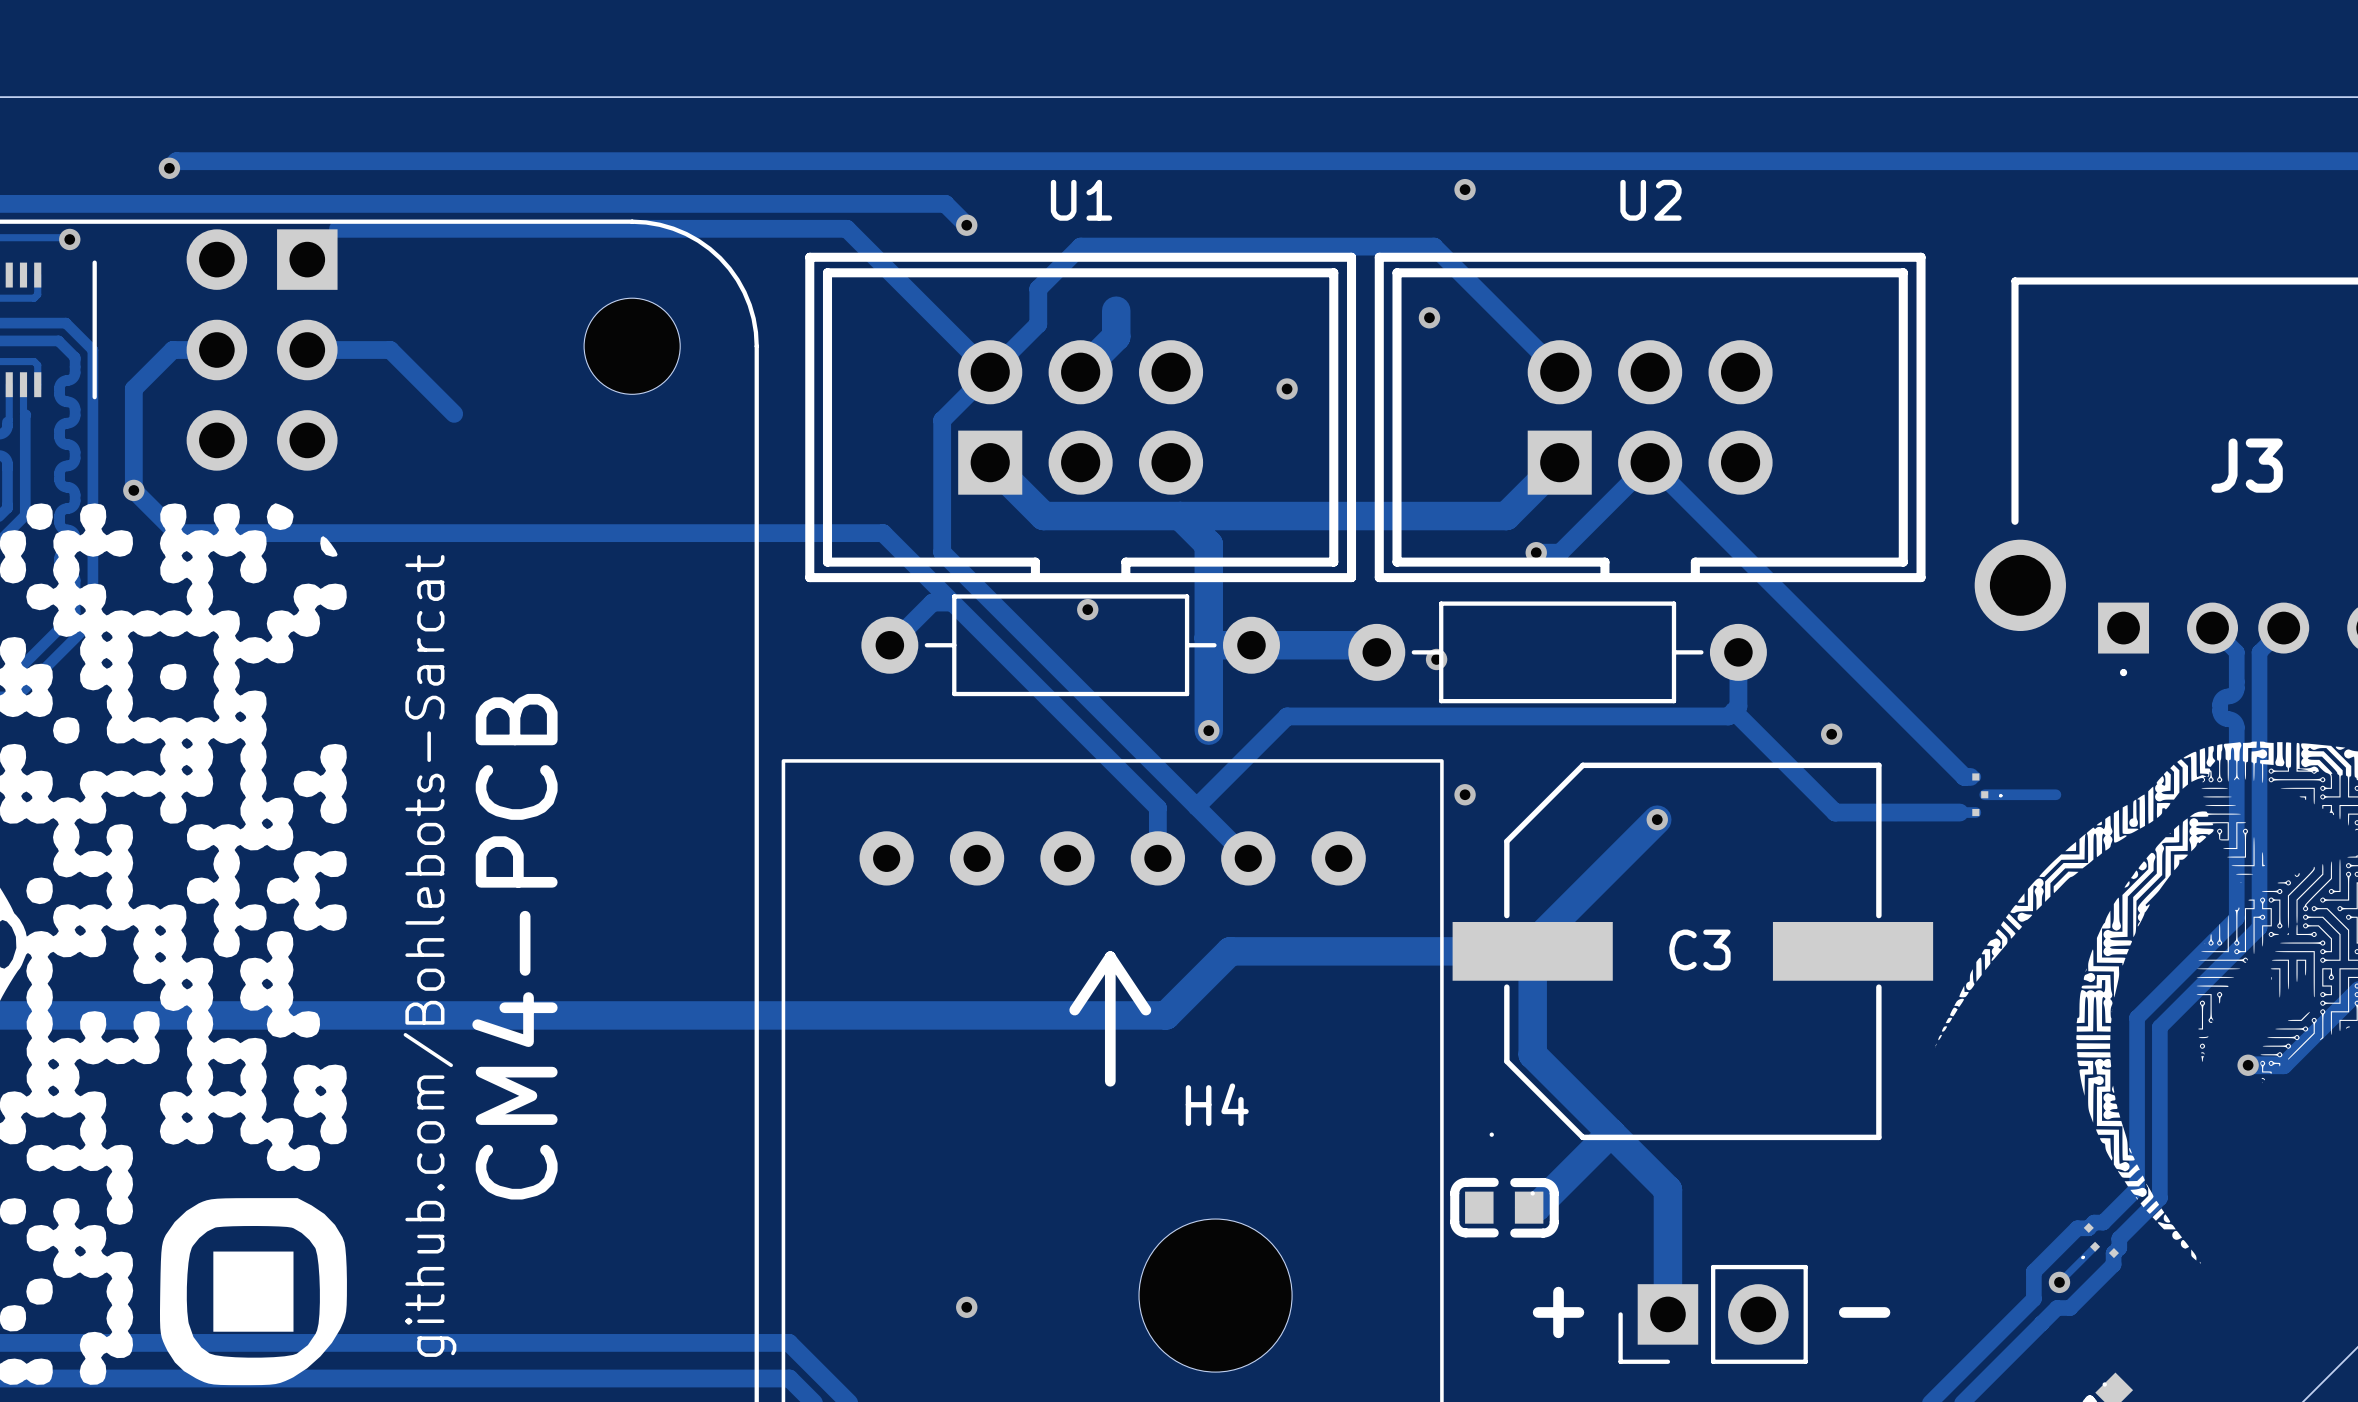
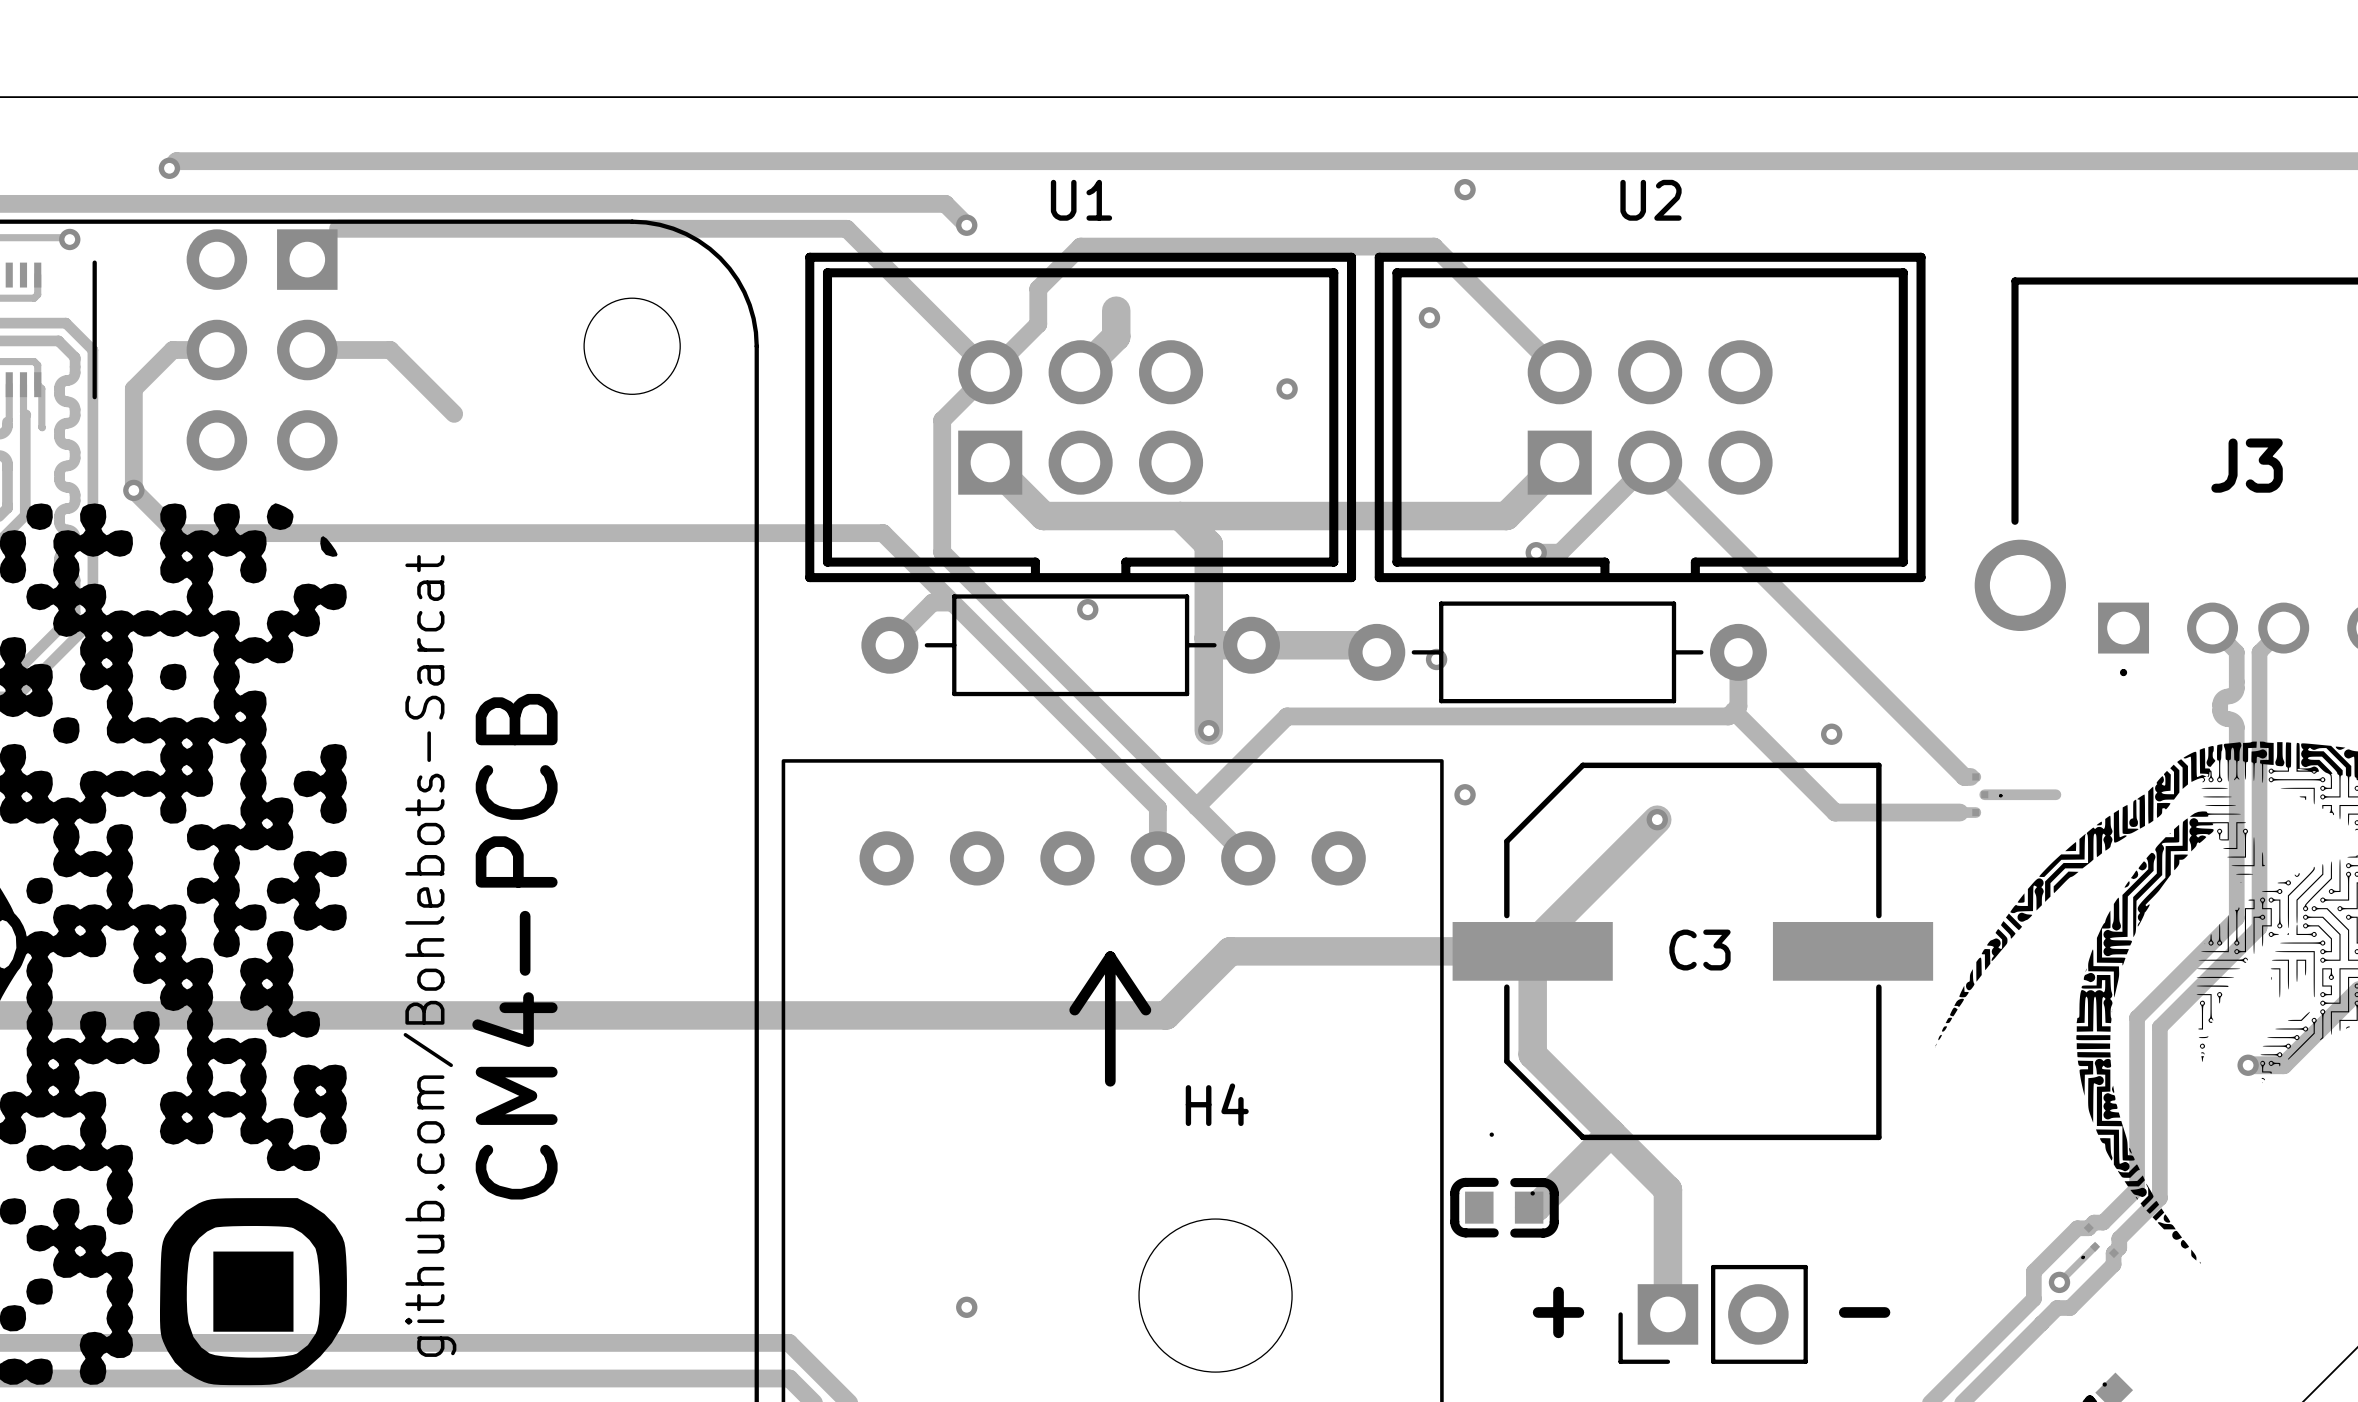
track: none -> (37, 384) (41, 388) (42, 427)

